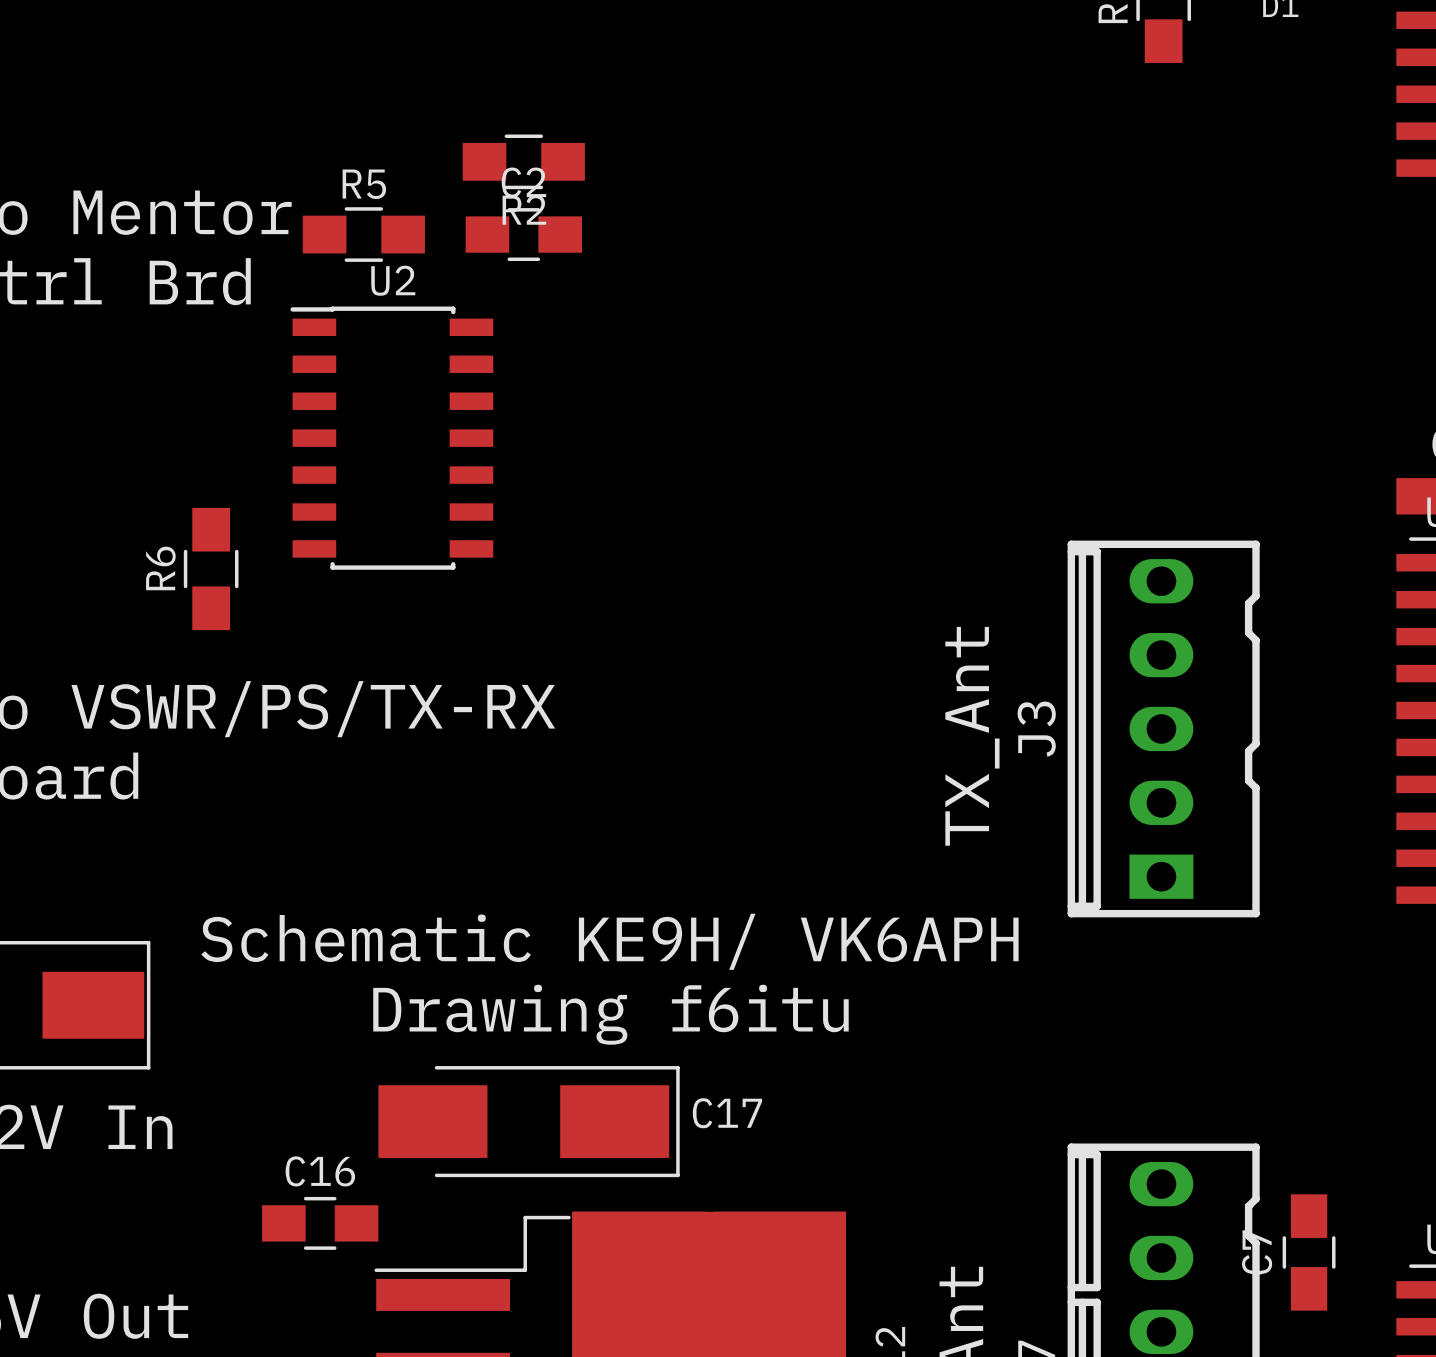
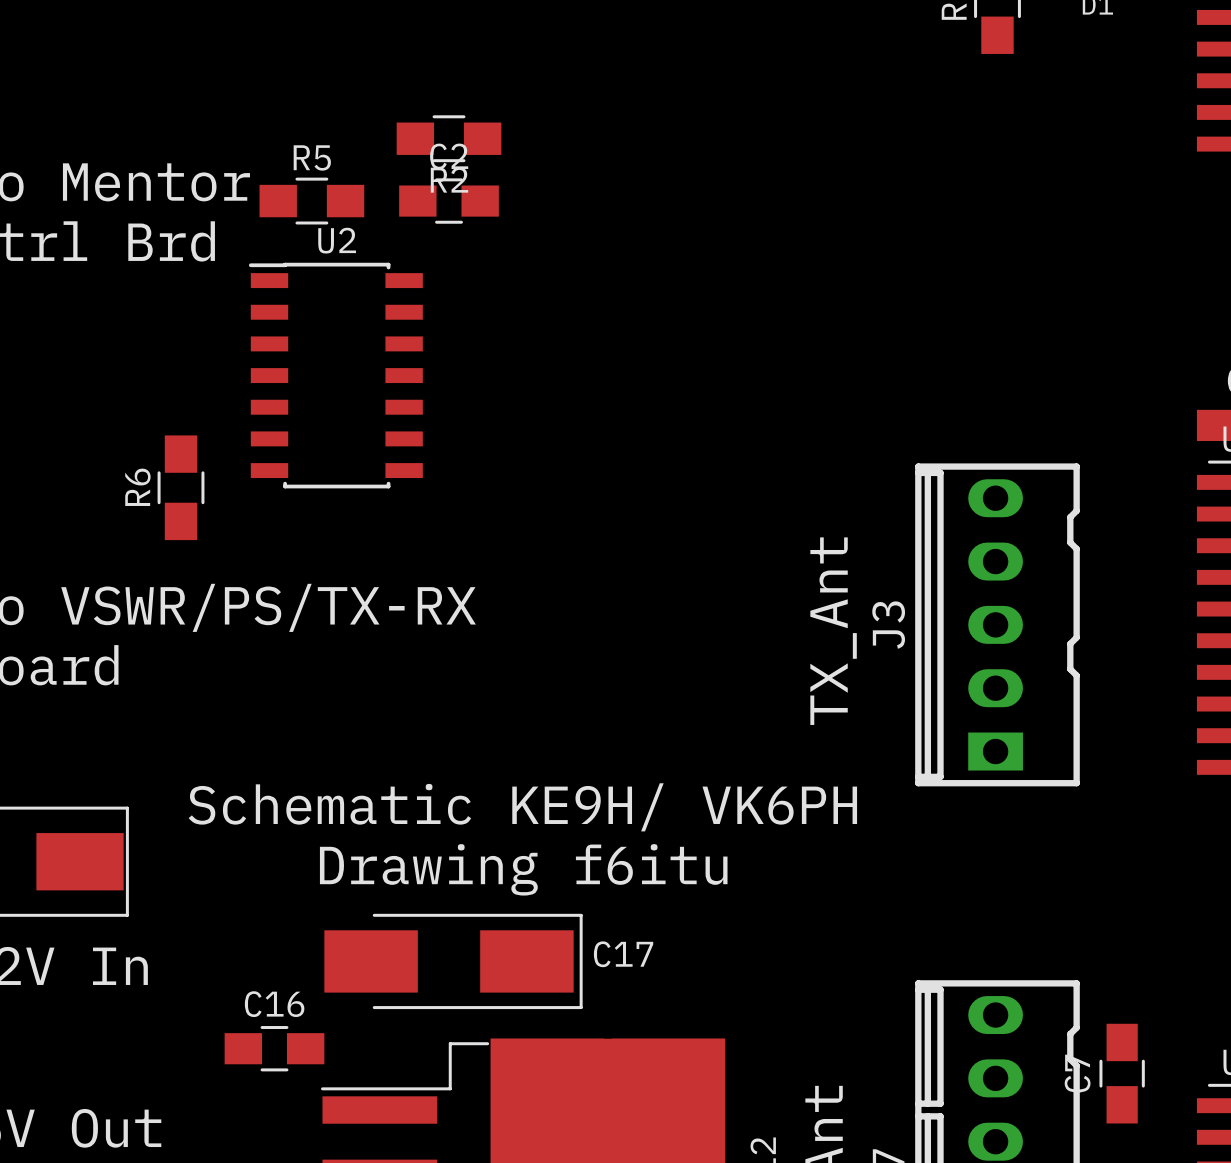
text: Schematic KE9H/ VK6APH (609, 941) -> Schematic KE9H/ VK6PH (522, 807)

